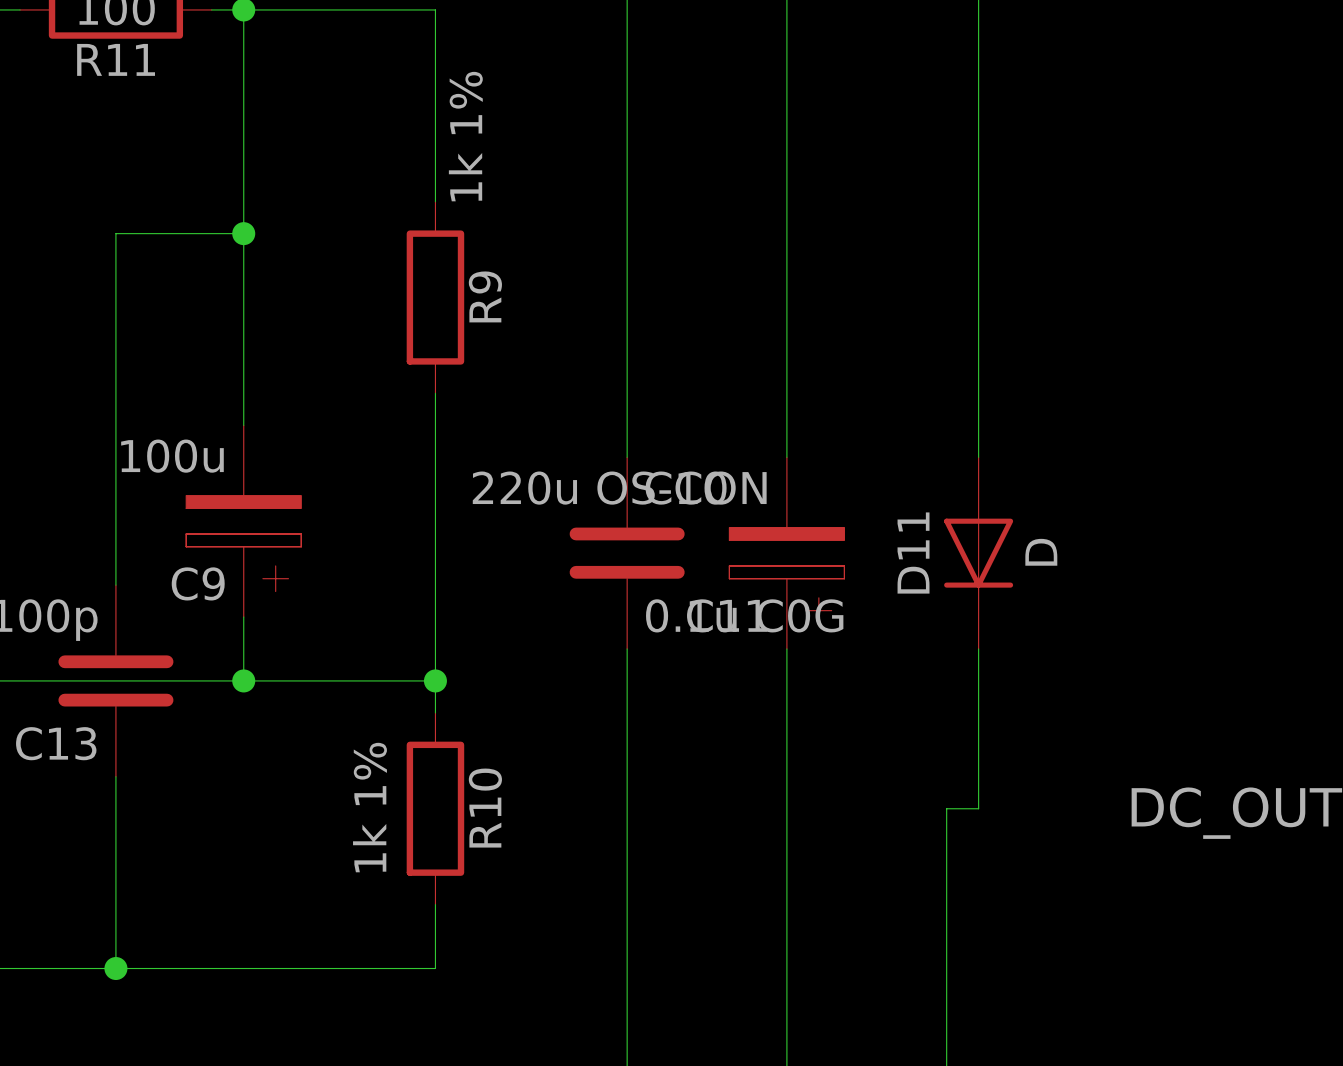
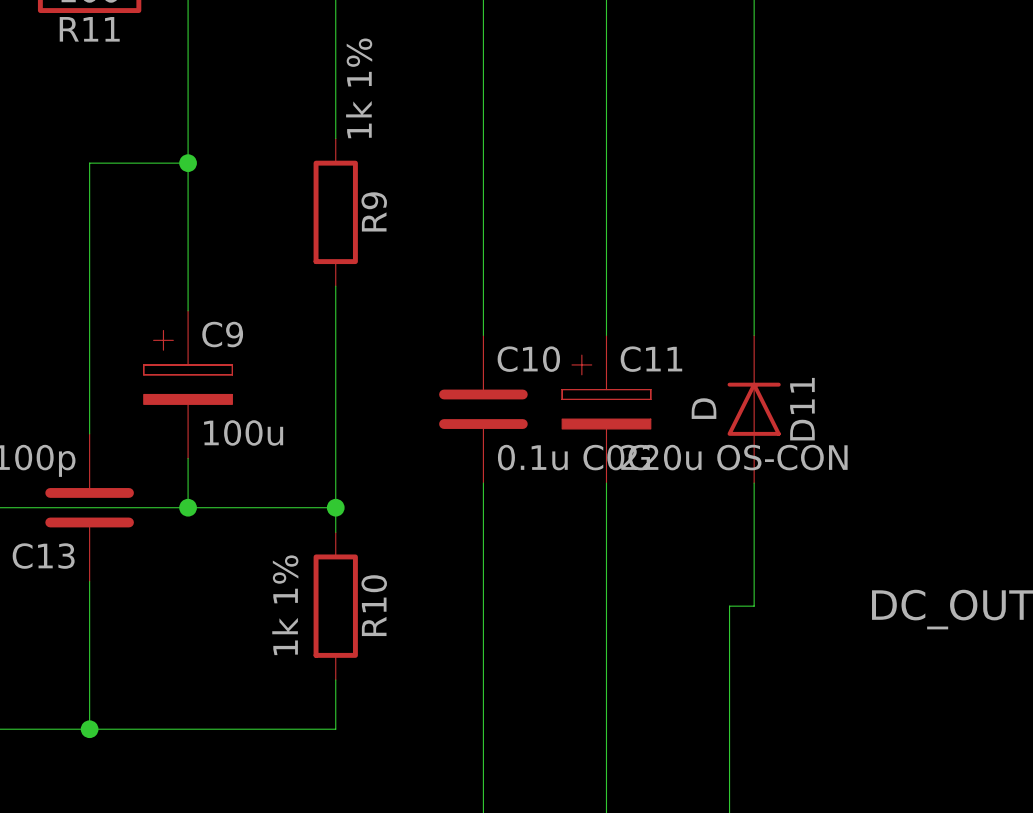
C9 rotation: 0° (243, 543) -> 180° (188, 367)
D11 rotation: 0° (978, 553) -> 180° (754, 409)
C11 rotation: 0° (786, 575) -> 180° (606, 392)

